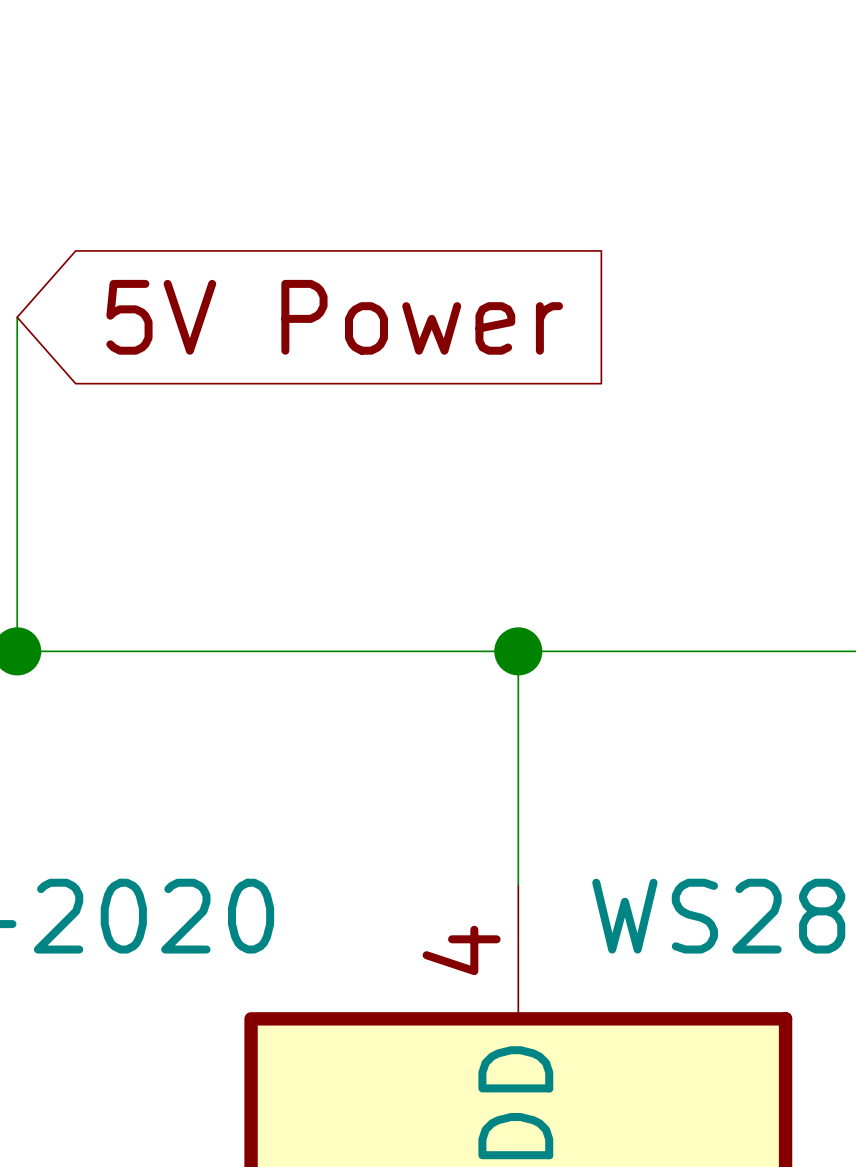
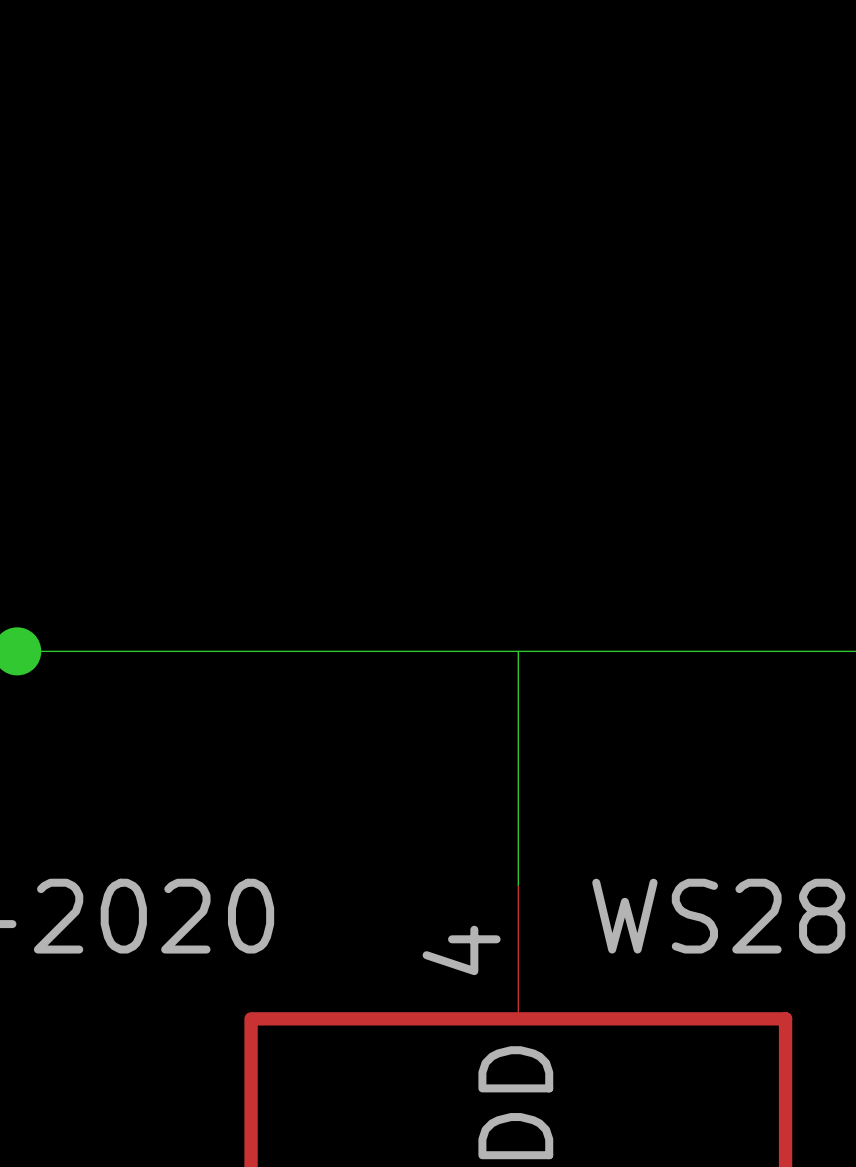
wire: (17, 317) (17, 651) -> none
global label: 5V Power (334, 317) -> none
junction: (518, 651) -> none

